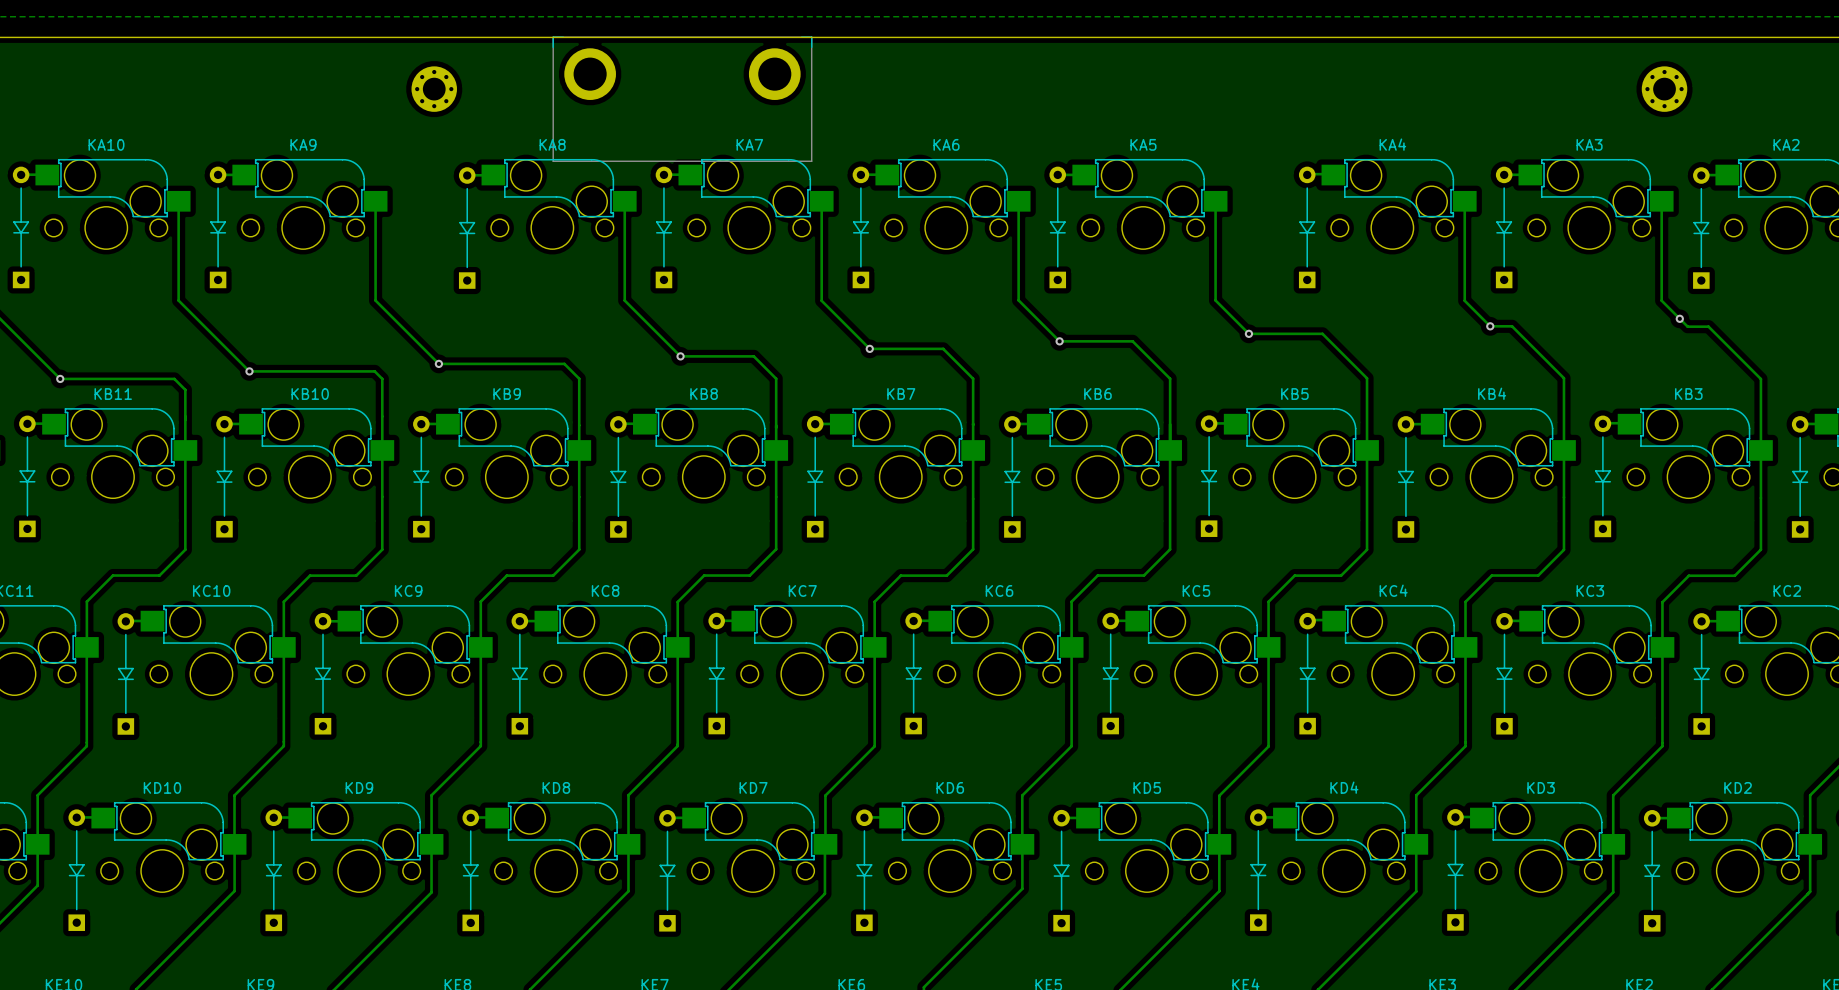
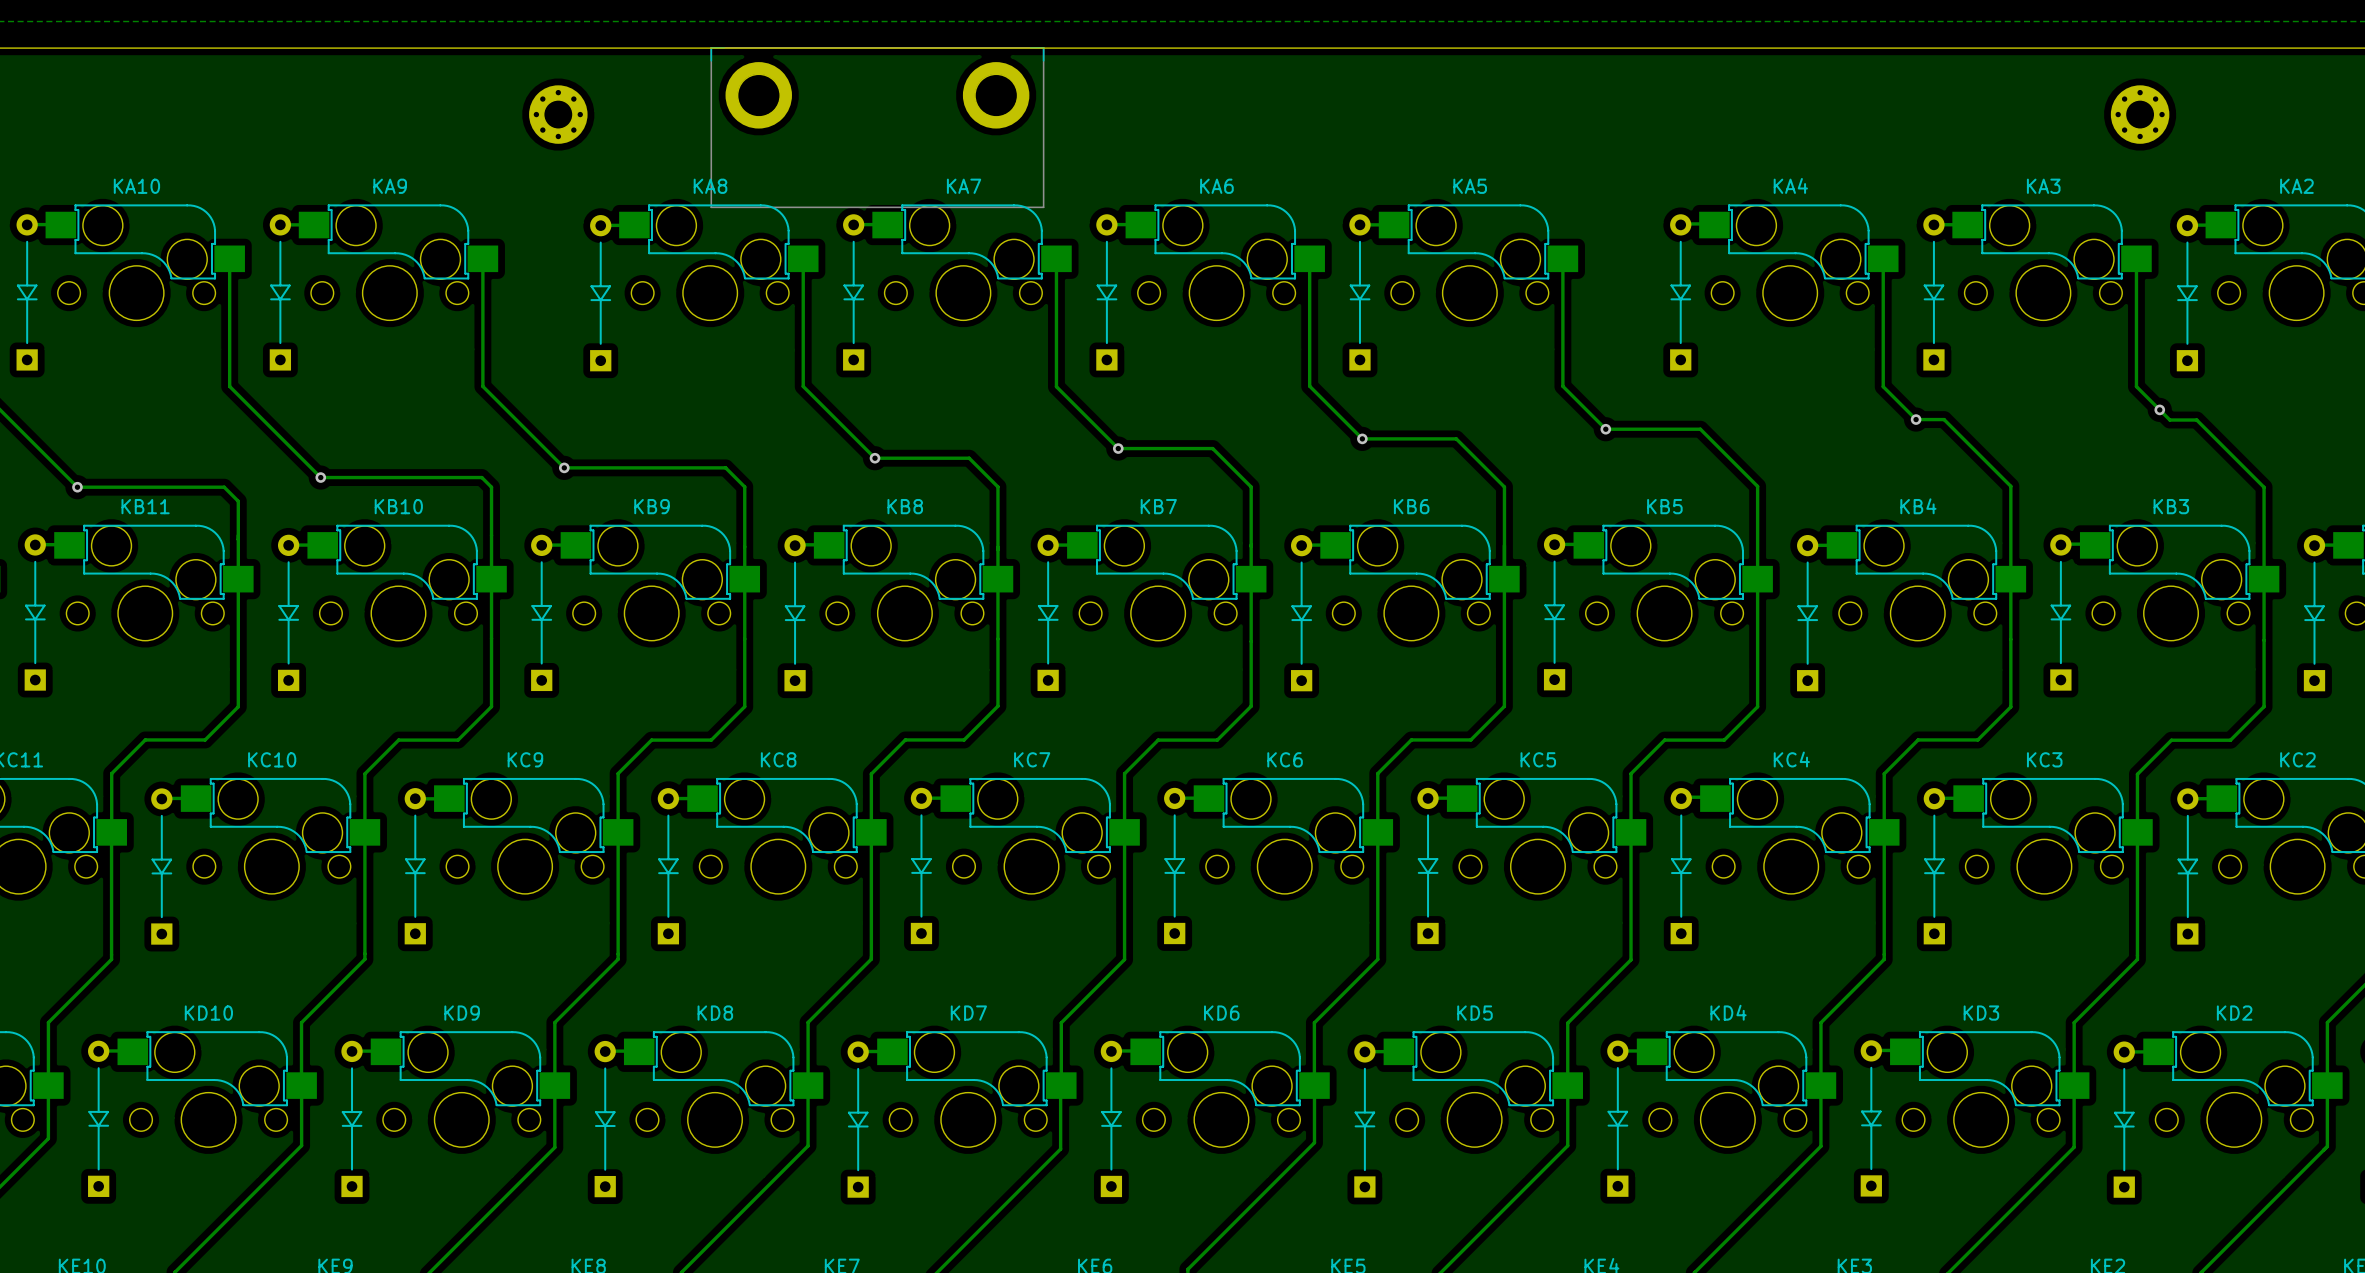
round board edge: none -> [737, 73, 781, 118]
round board edge: none -> [974, 73, 1018, 118]
round board edge: none -> [543, 99, 574, 130]
round board edge: none -> [2125, 99, 2156, 130]

